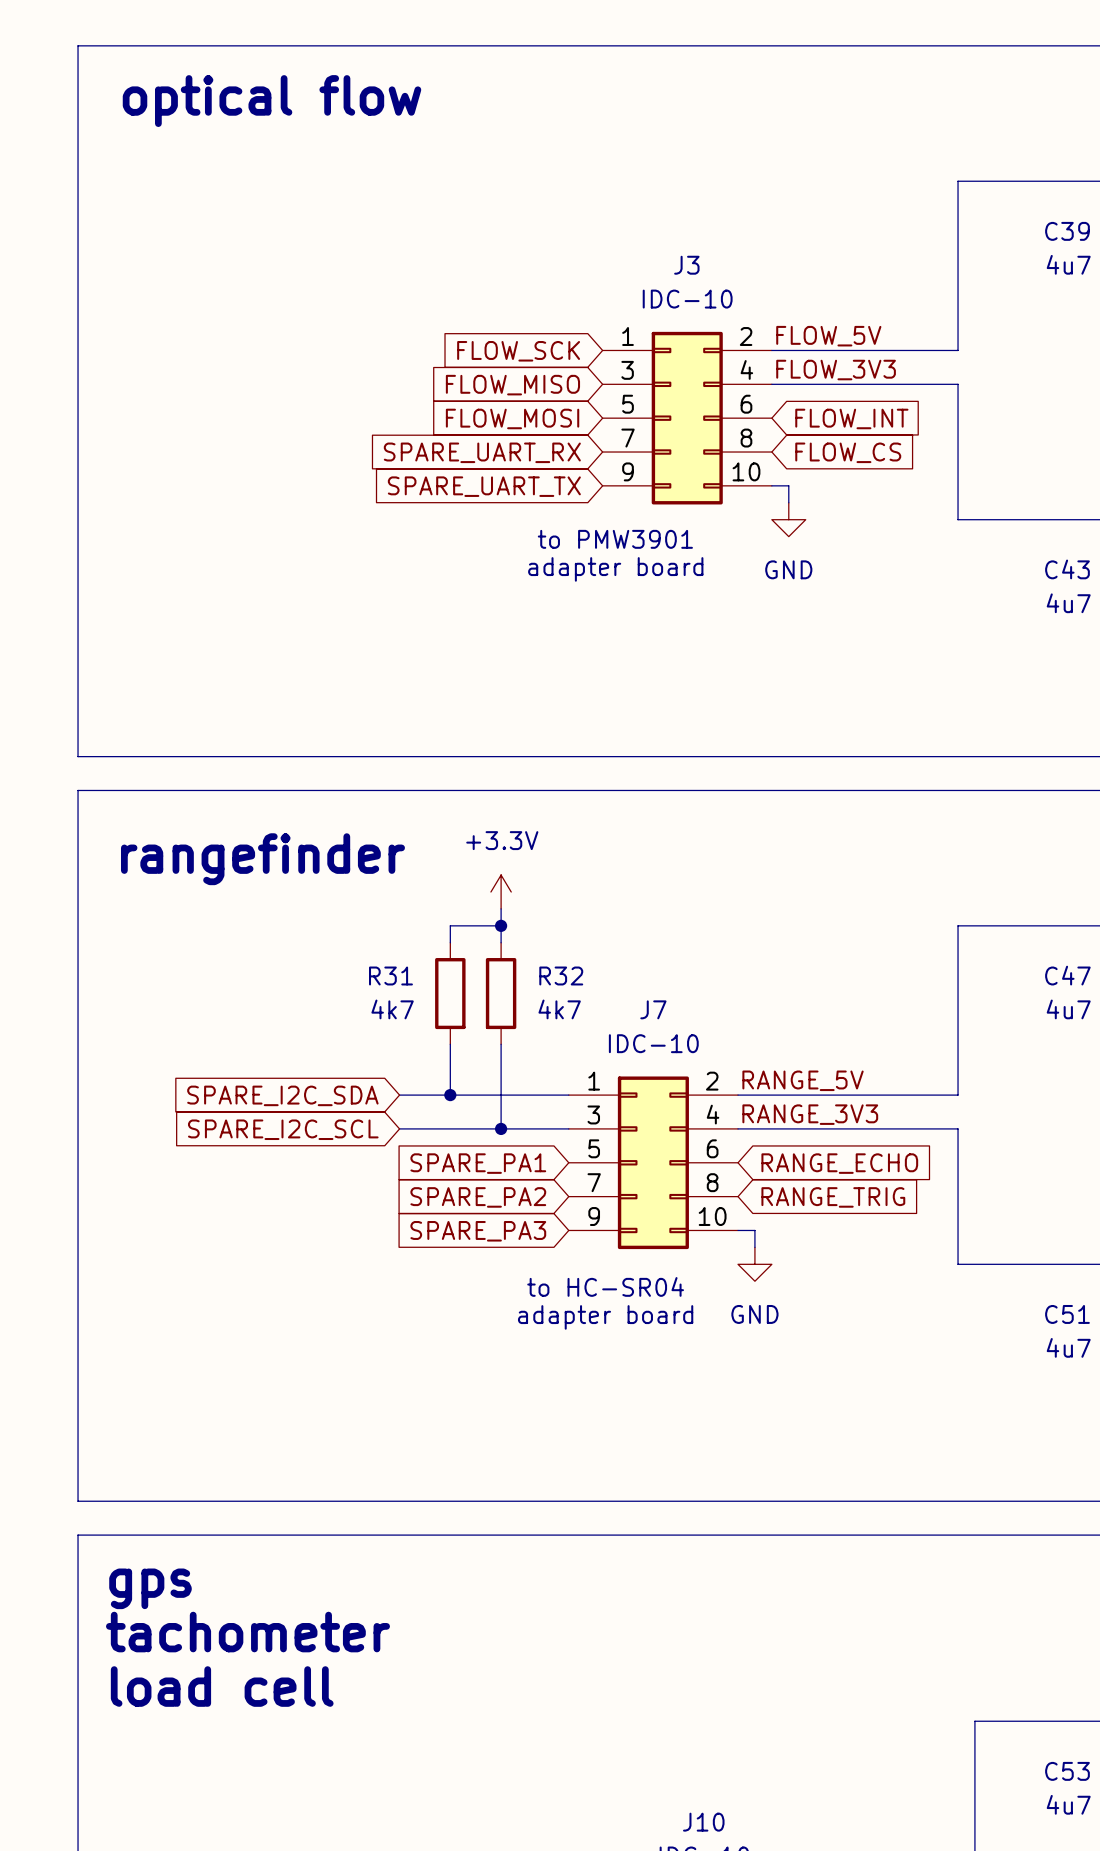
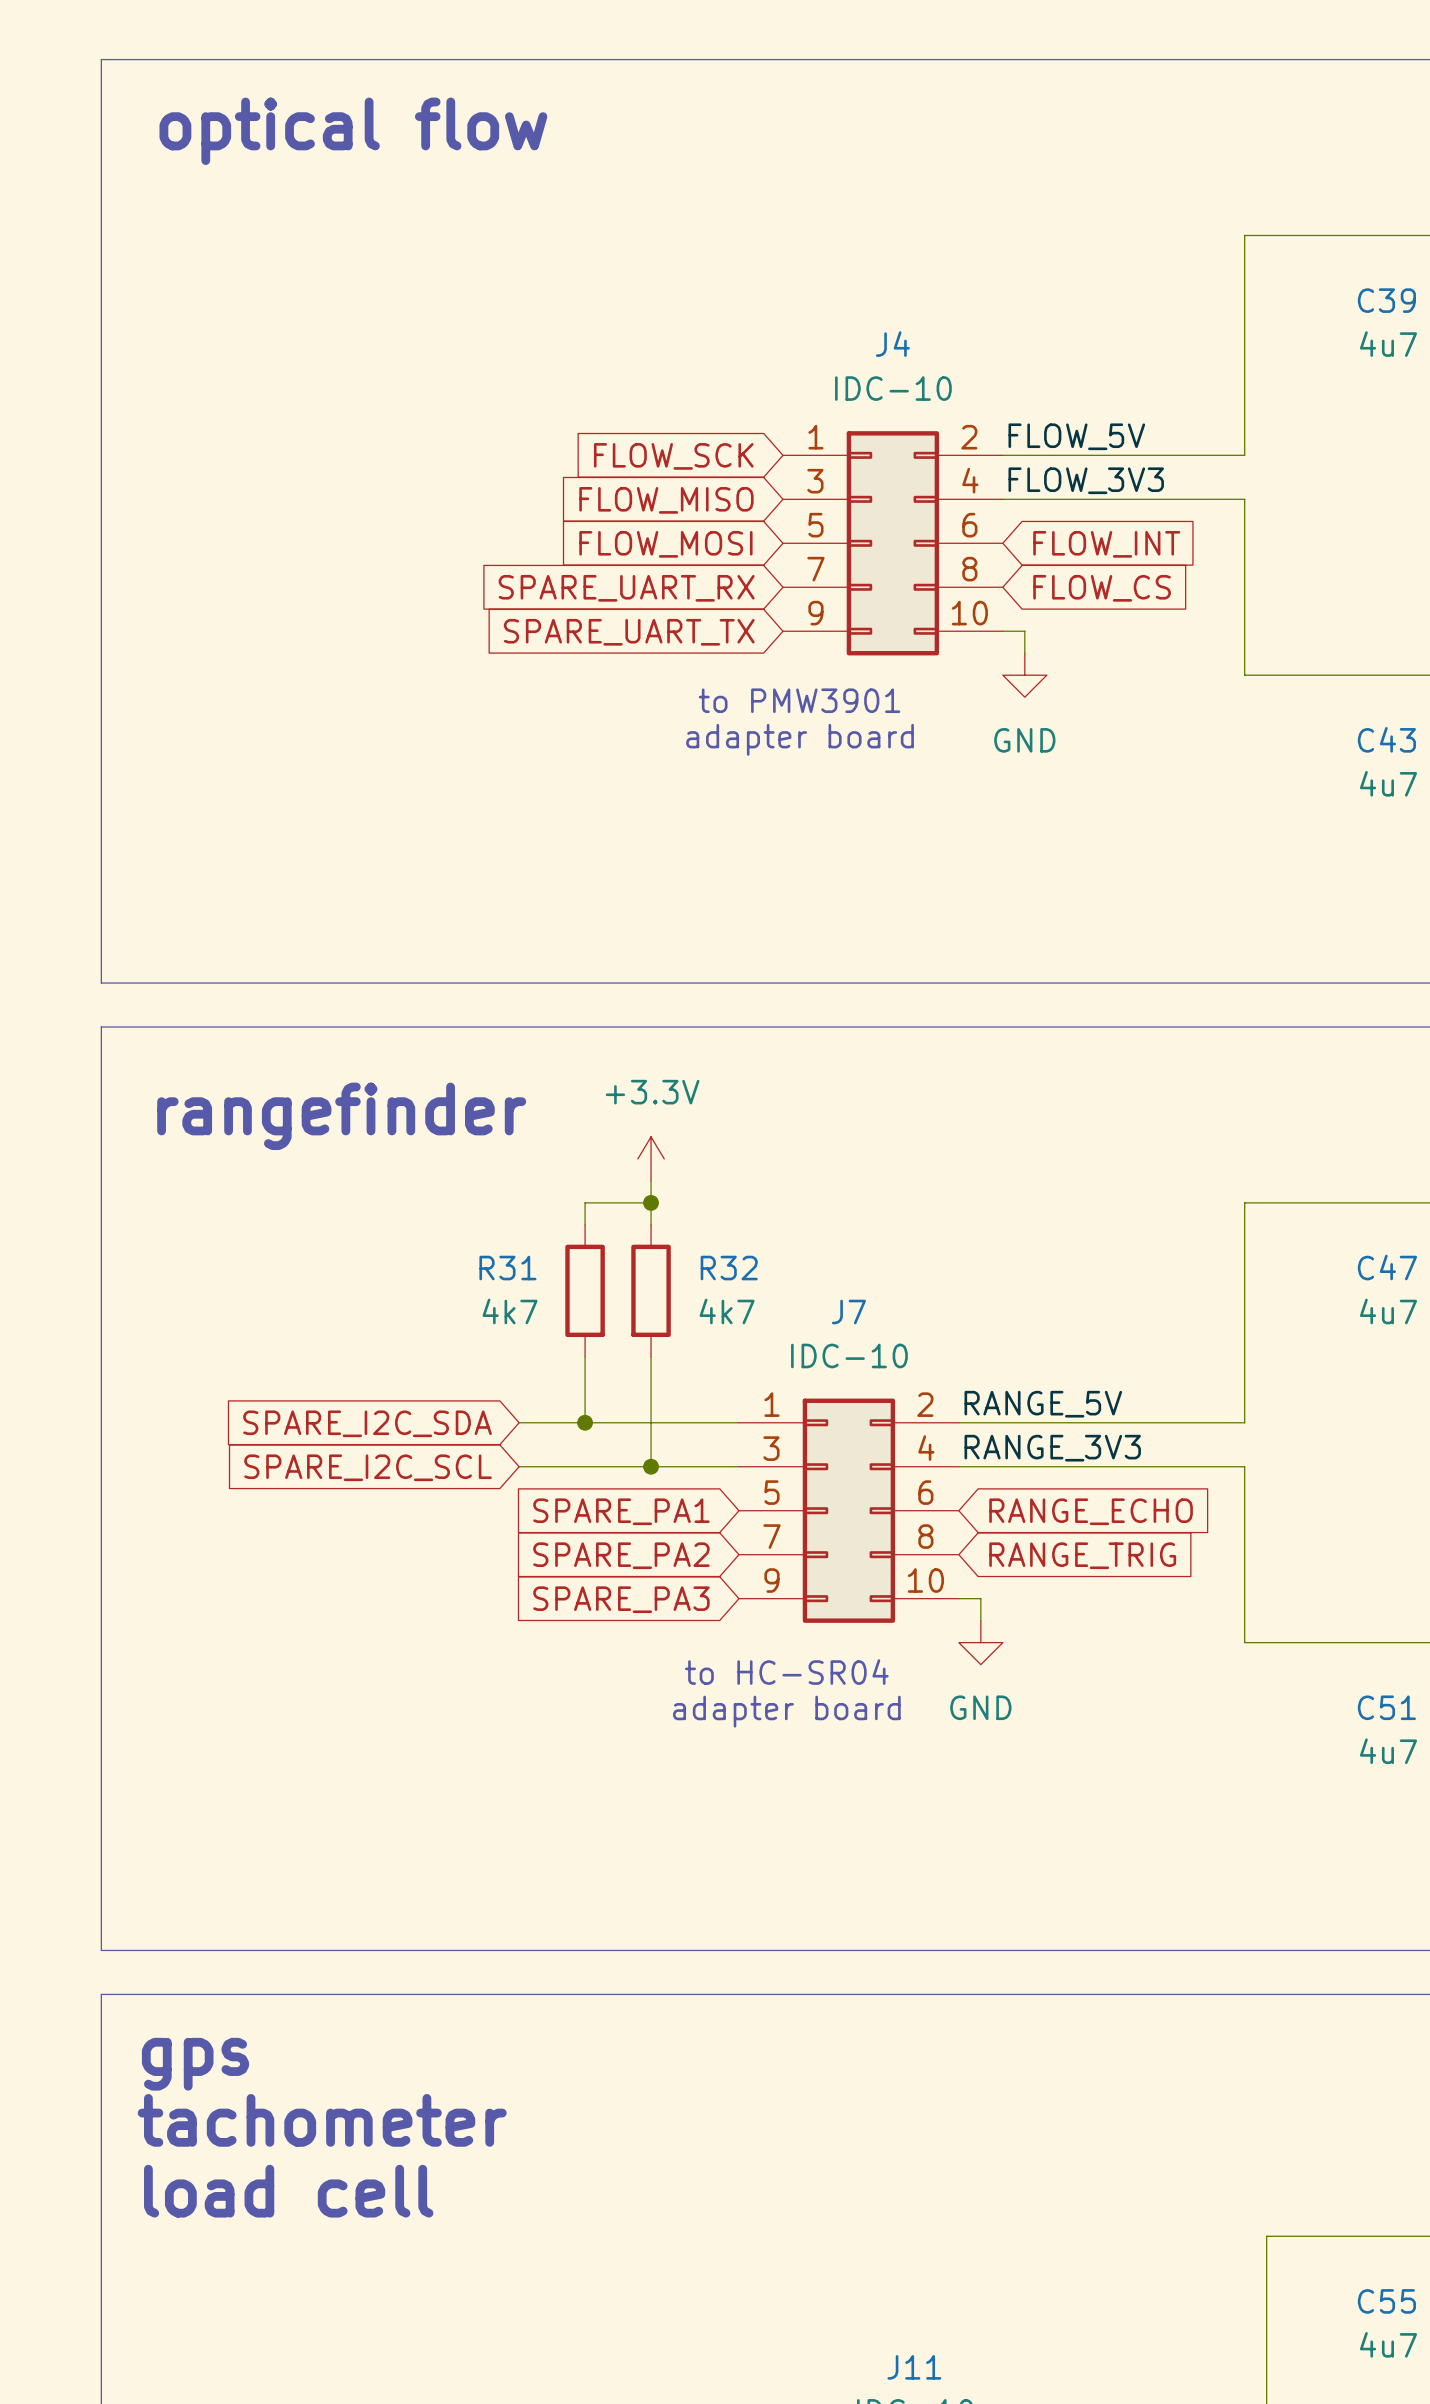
J3 name: J3 (686, 265) -> J4 (892, 344)
C53 name: C53 (1067, 1771) -> C55 (1386, 2301)
J10 name: J10 (703, 1822) -> J11 (914, 2367)

